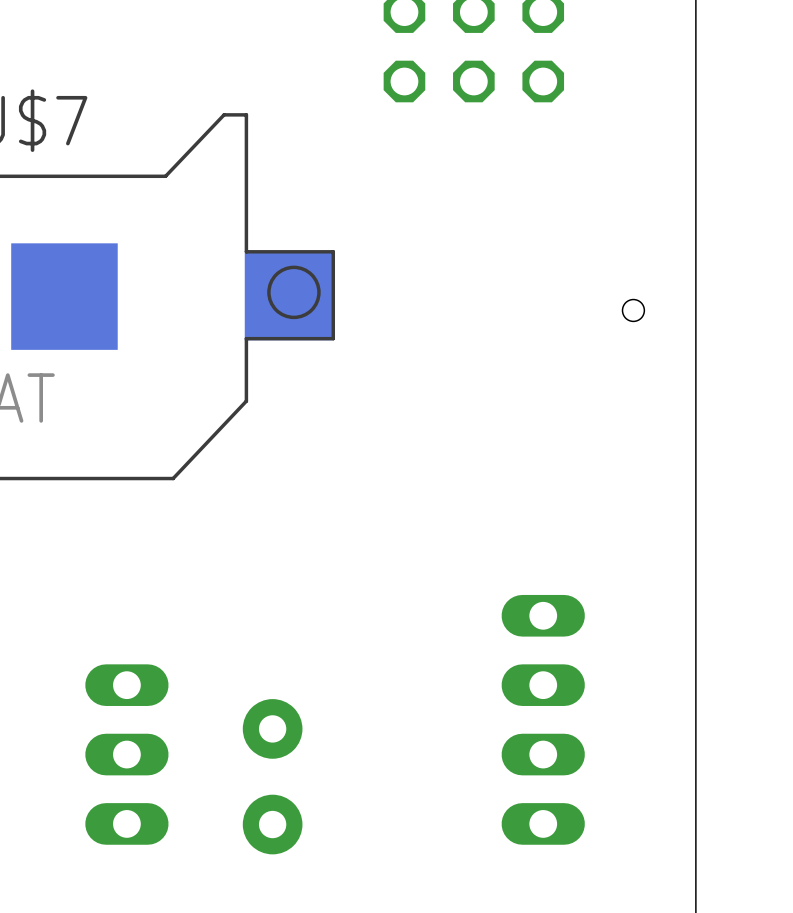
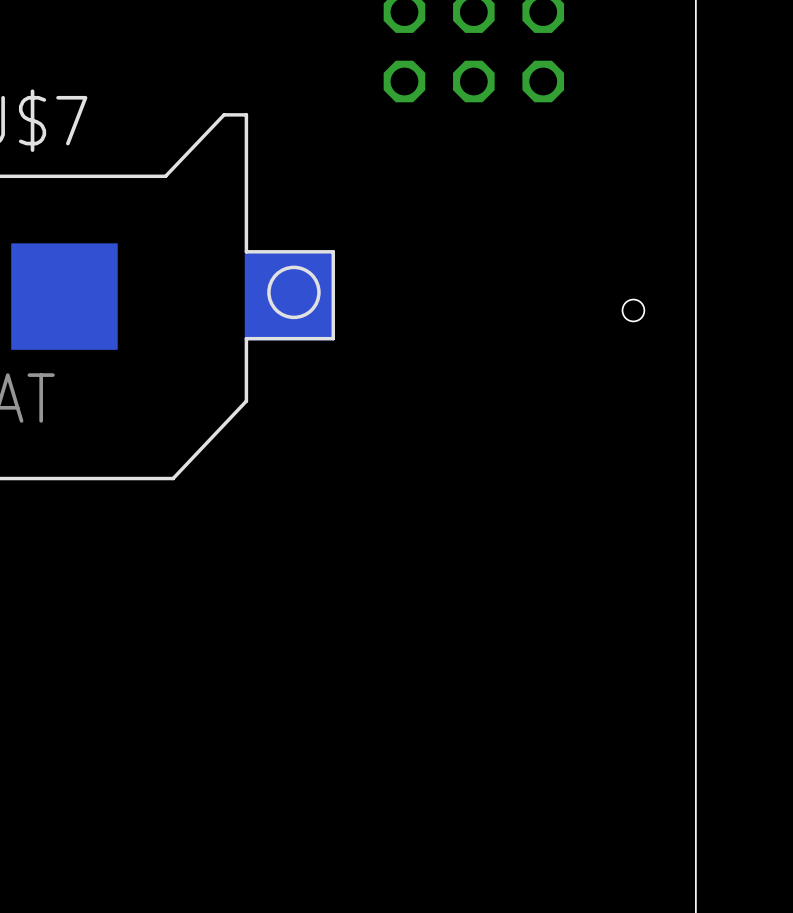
part: (543, 719) -> none
part: (126, 754) -> none
part: (272, 776) -> none

